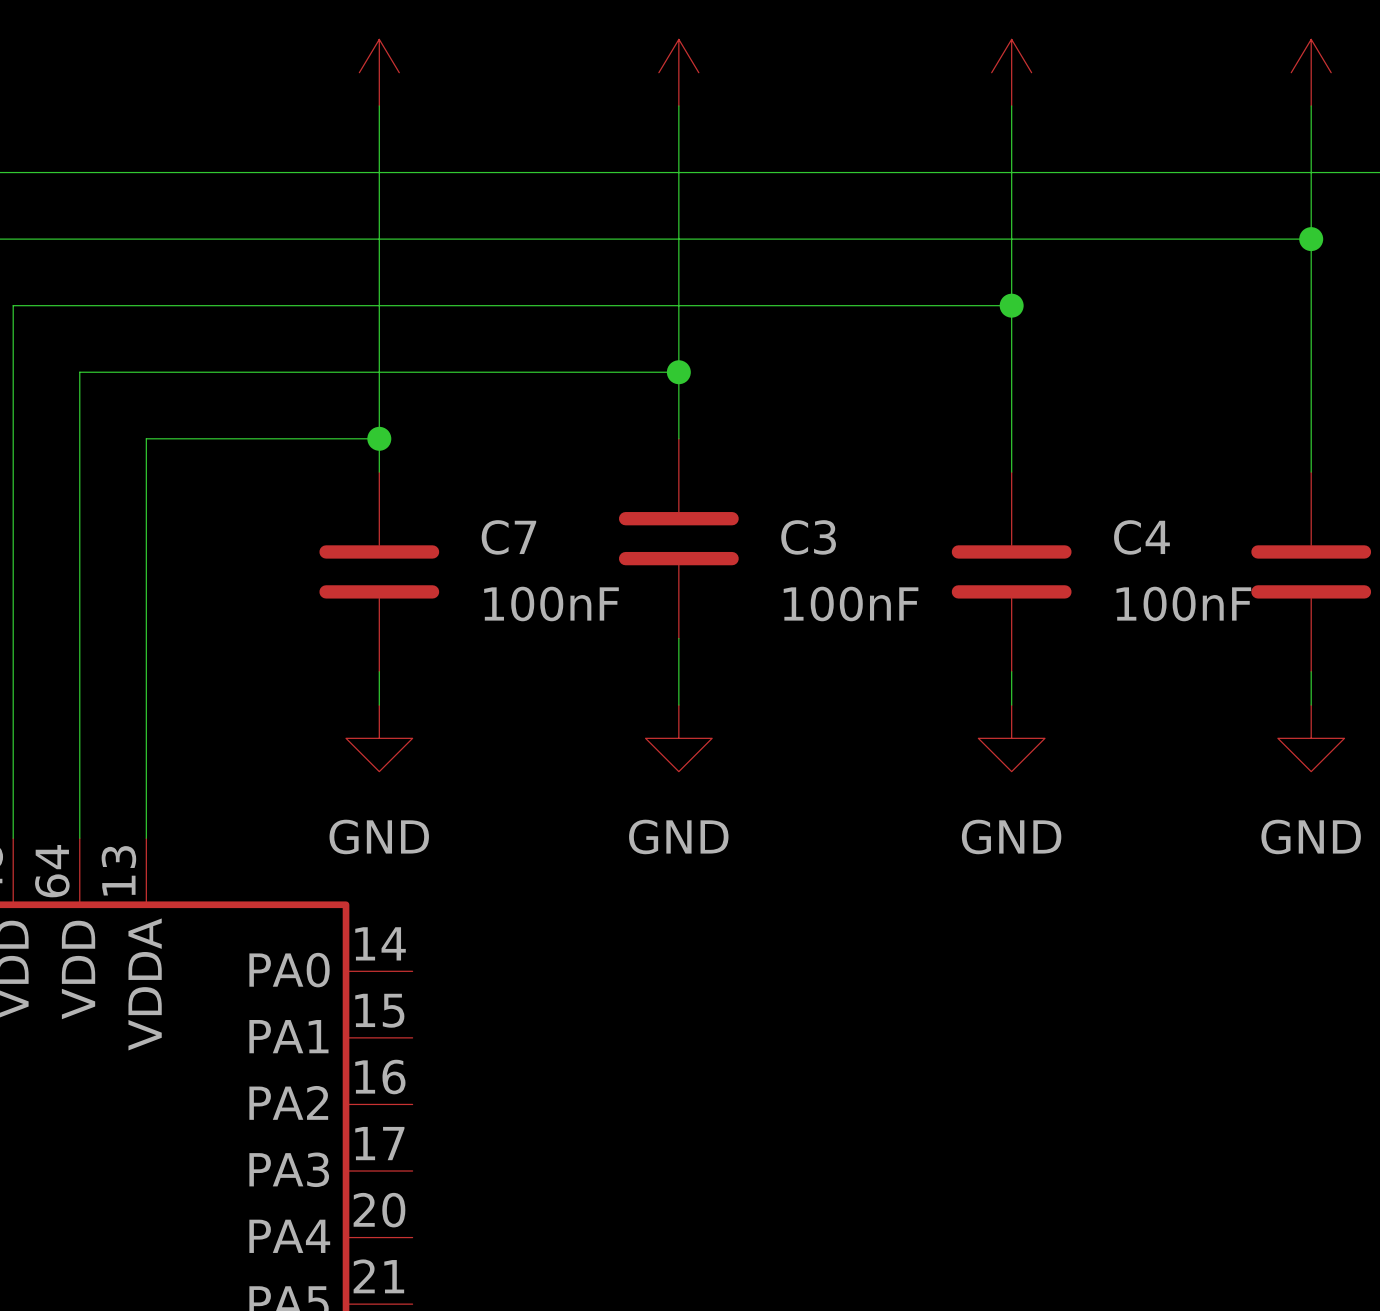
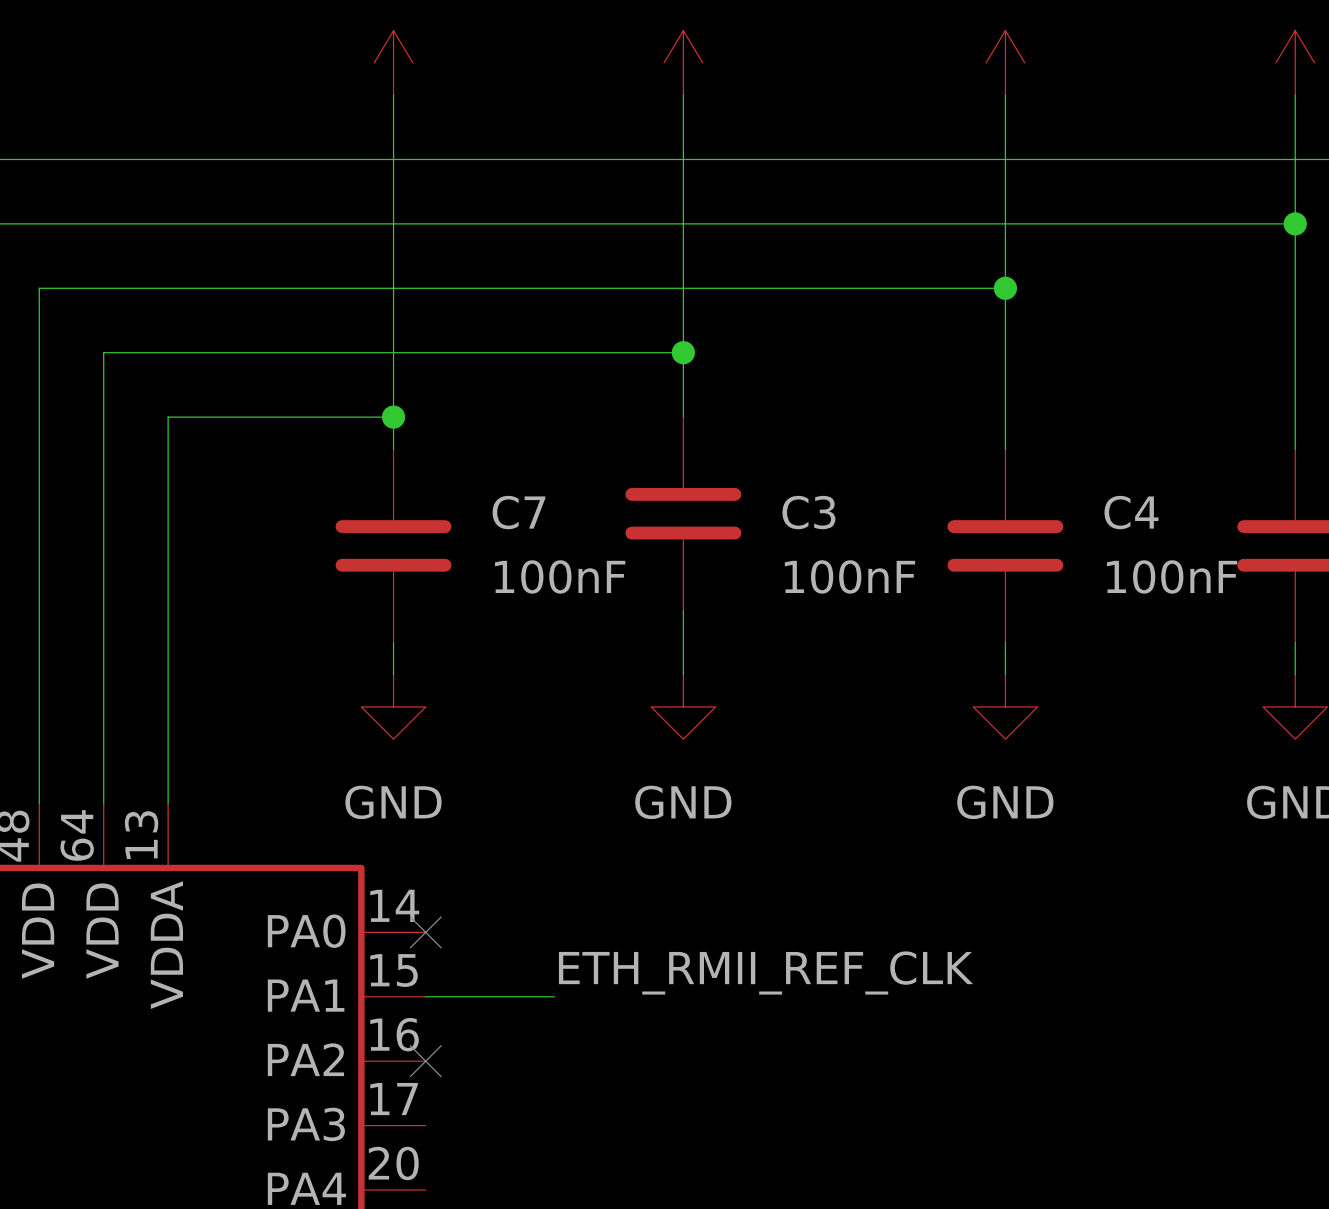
no-connect mark: none -> (425, 932)
label: none -> ETH_RMII_REF_CLK (766, 972)
wire: none -> (425, 996) (554, 996)
no-connect mark: none -> (425, 1061)

